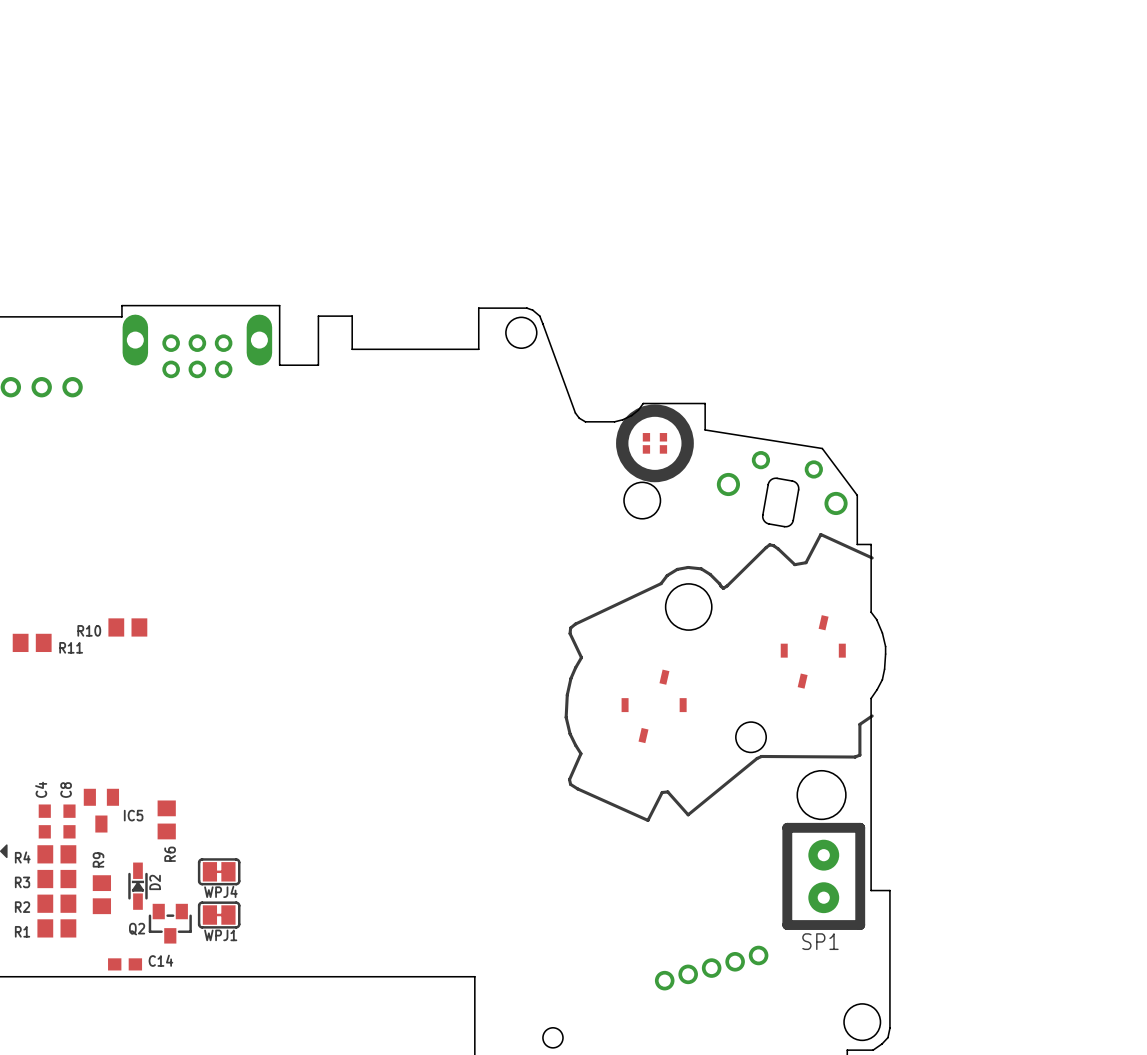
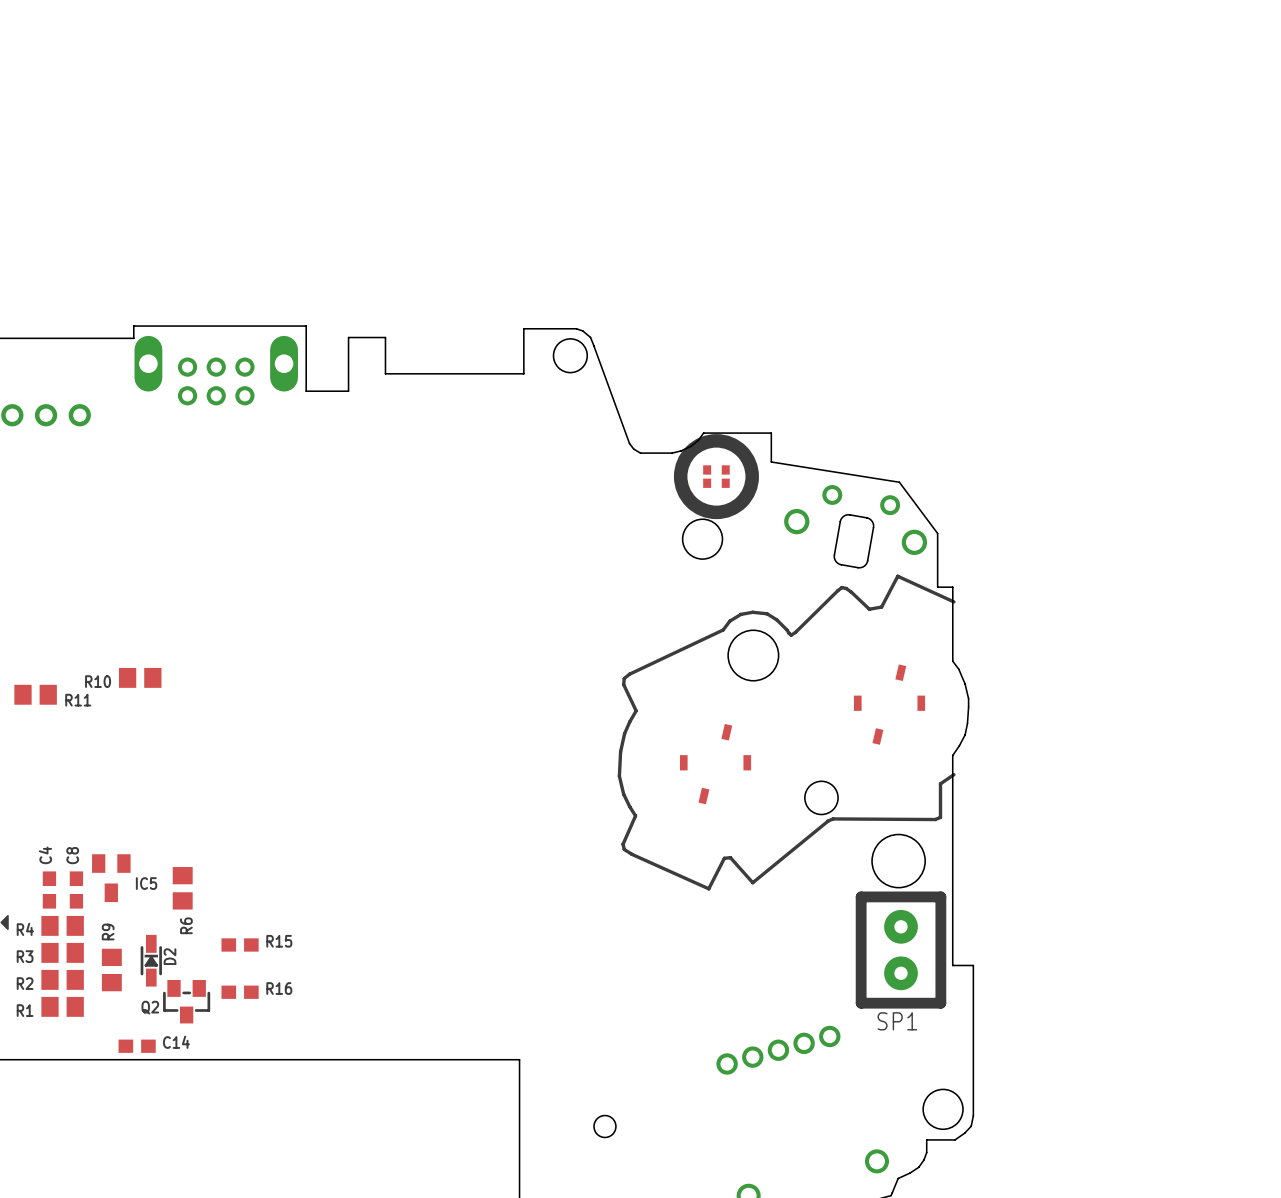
WPJ4: (219, 871) -> none
R15: none -> (240, 944)
WPJ1: (219, 915) -> none
R16: none -> (240, 992)

